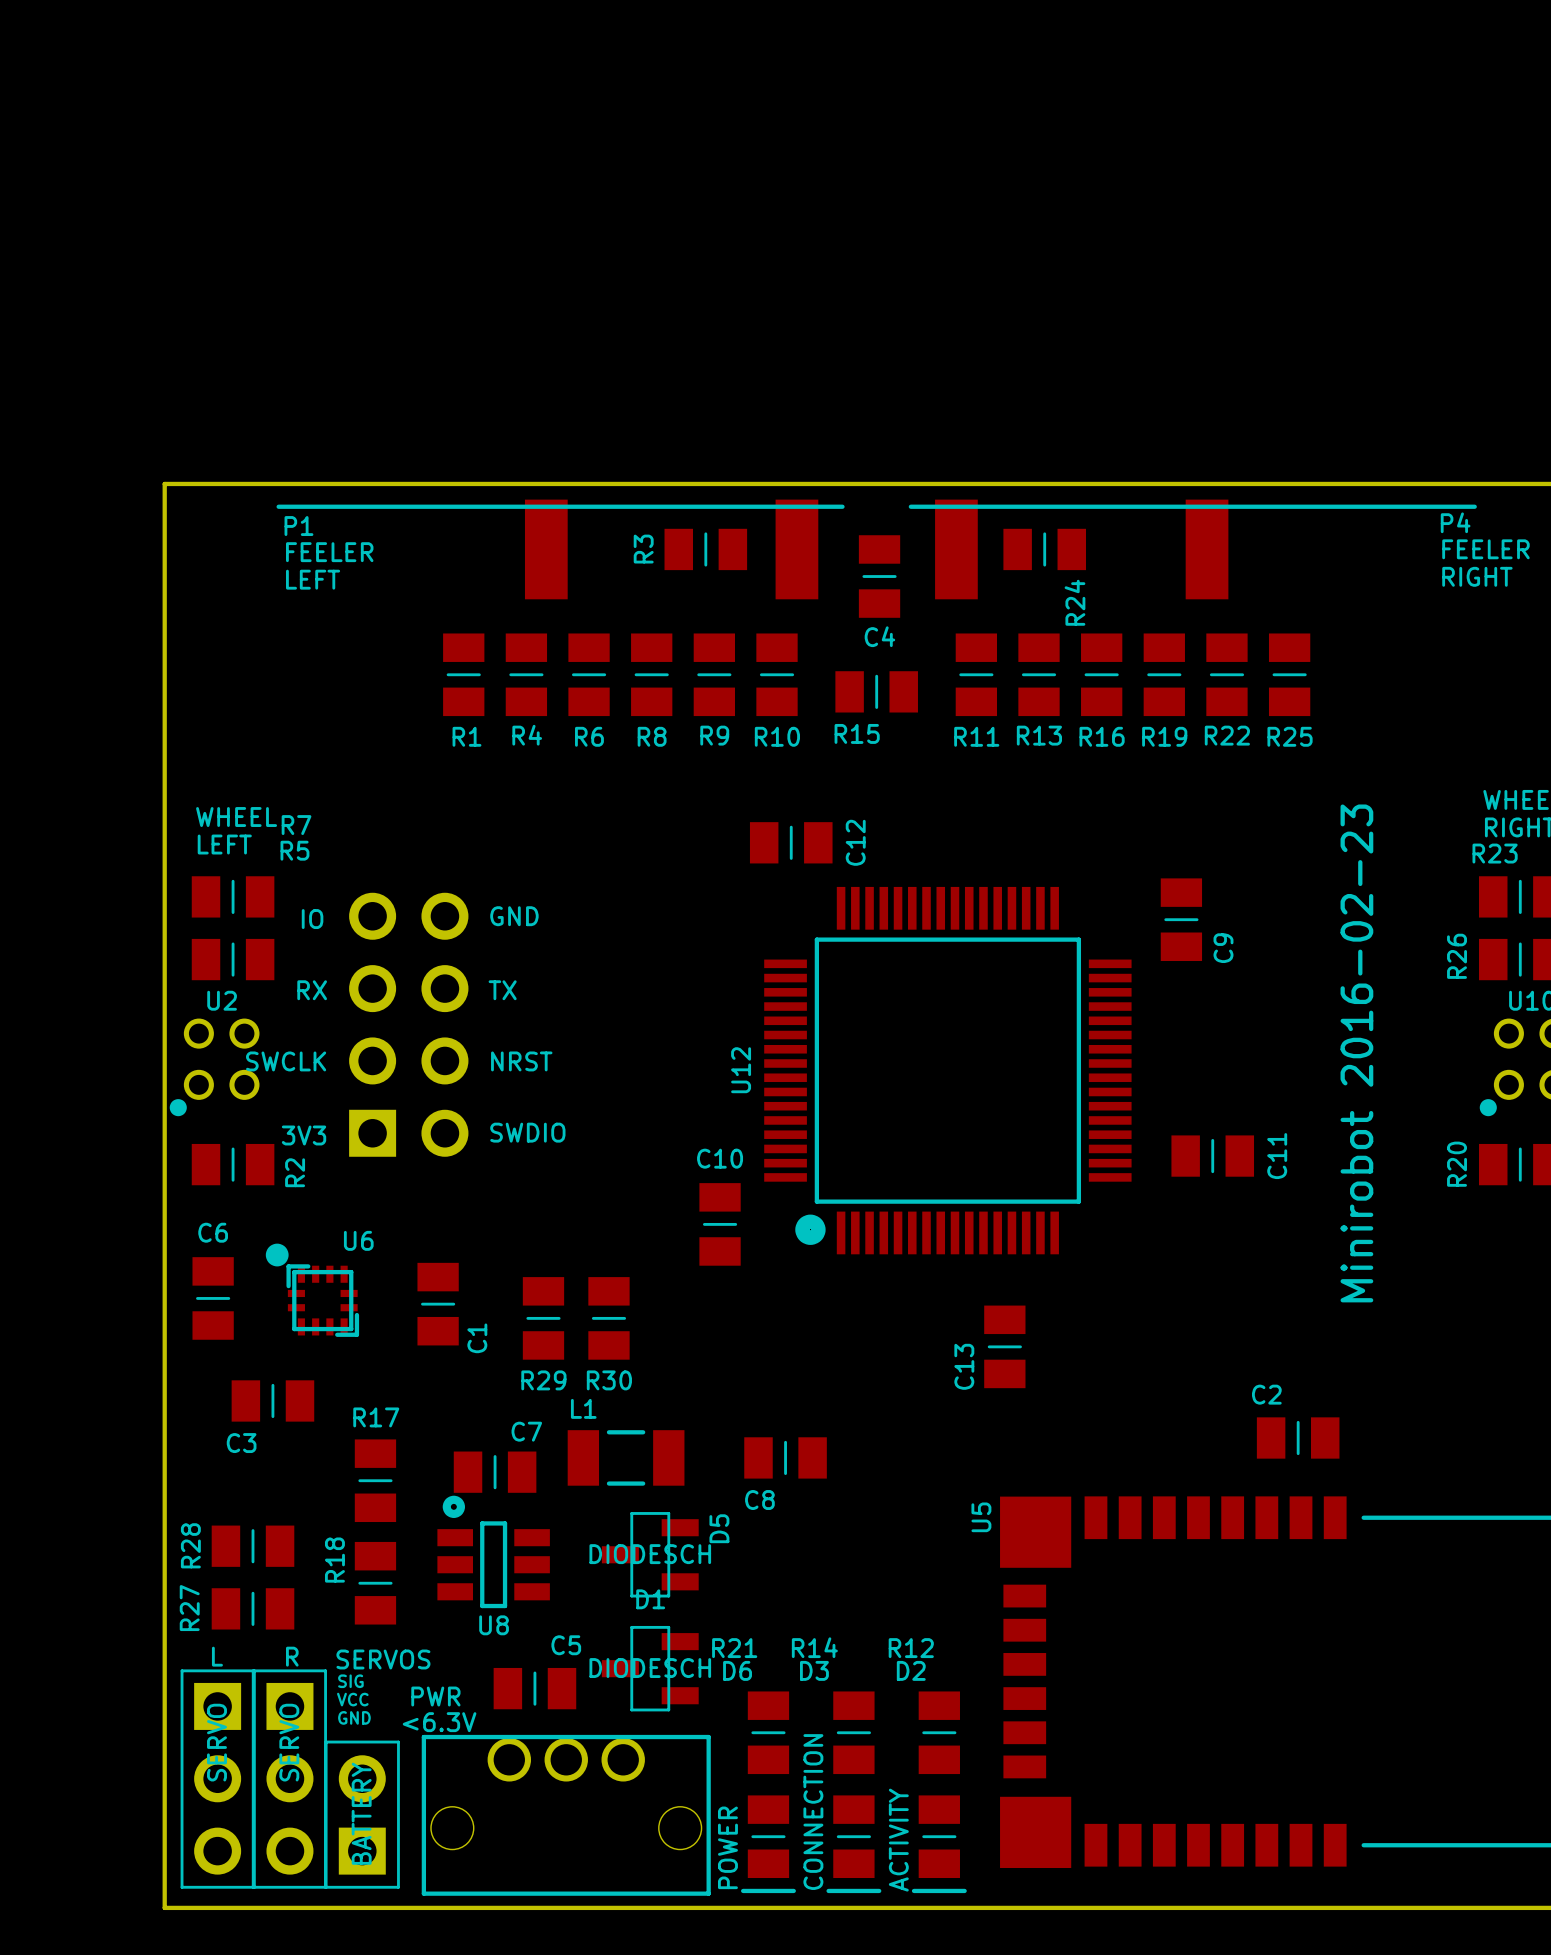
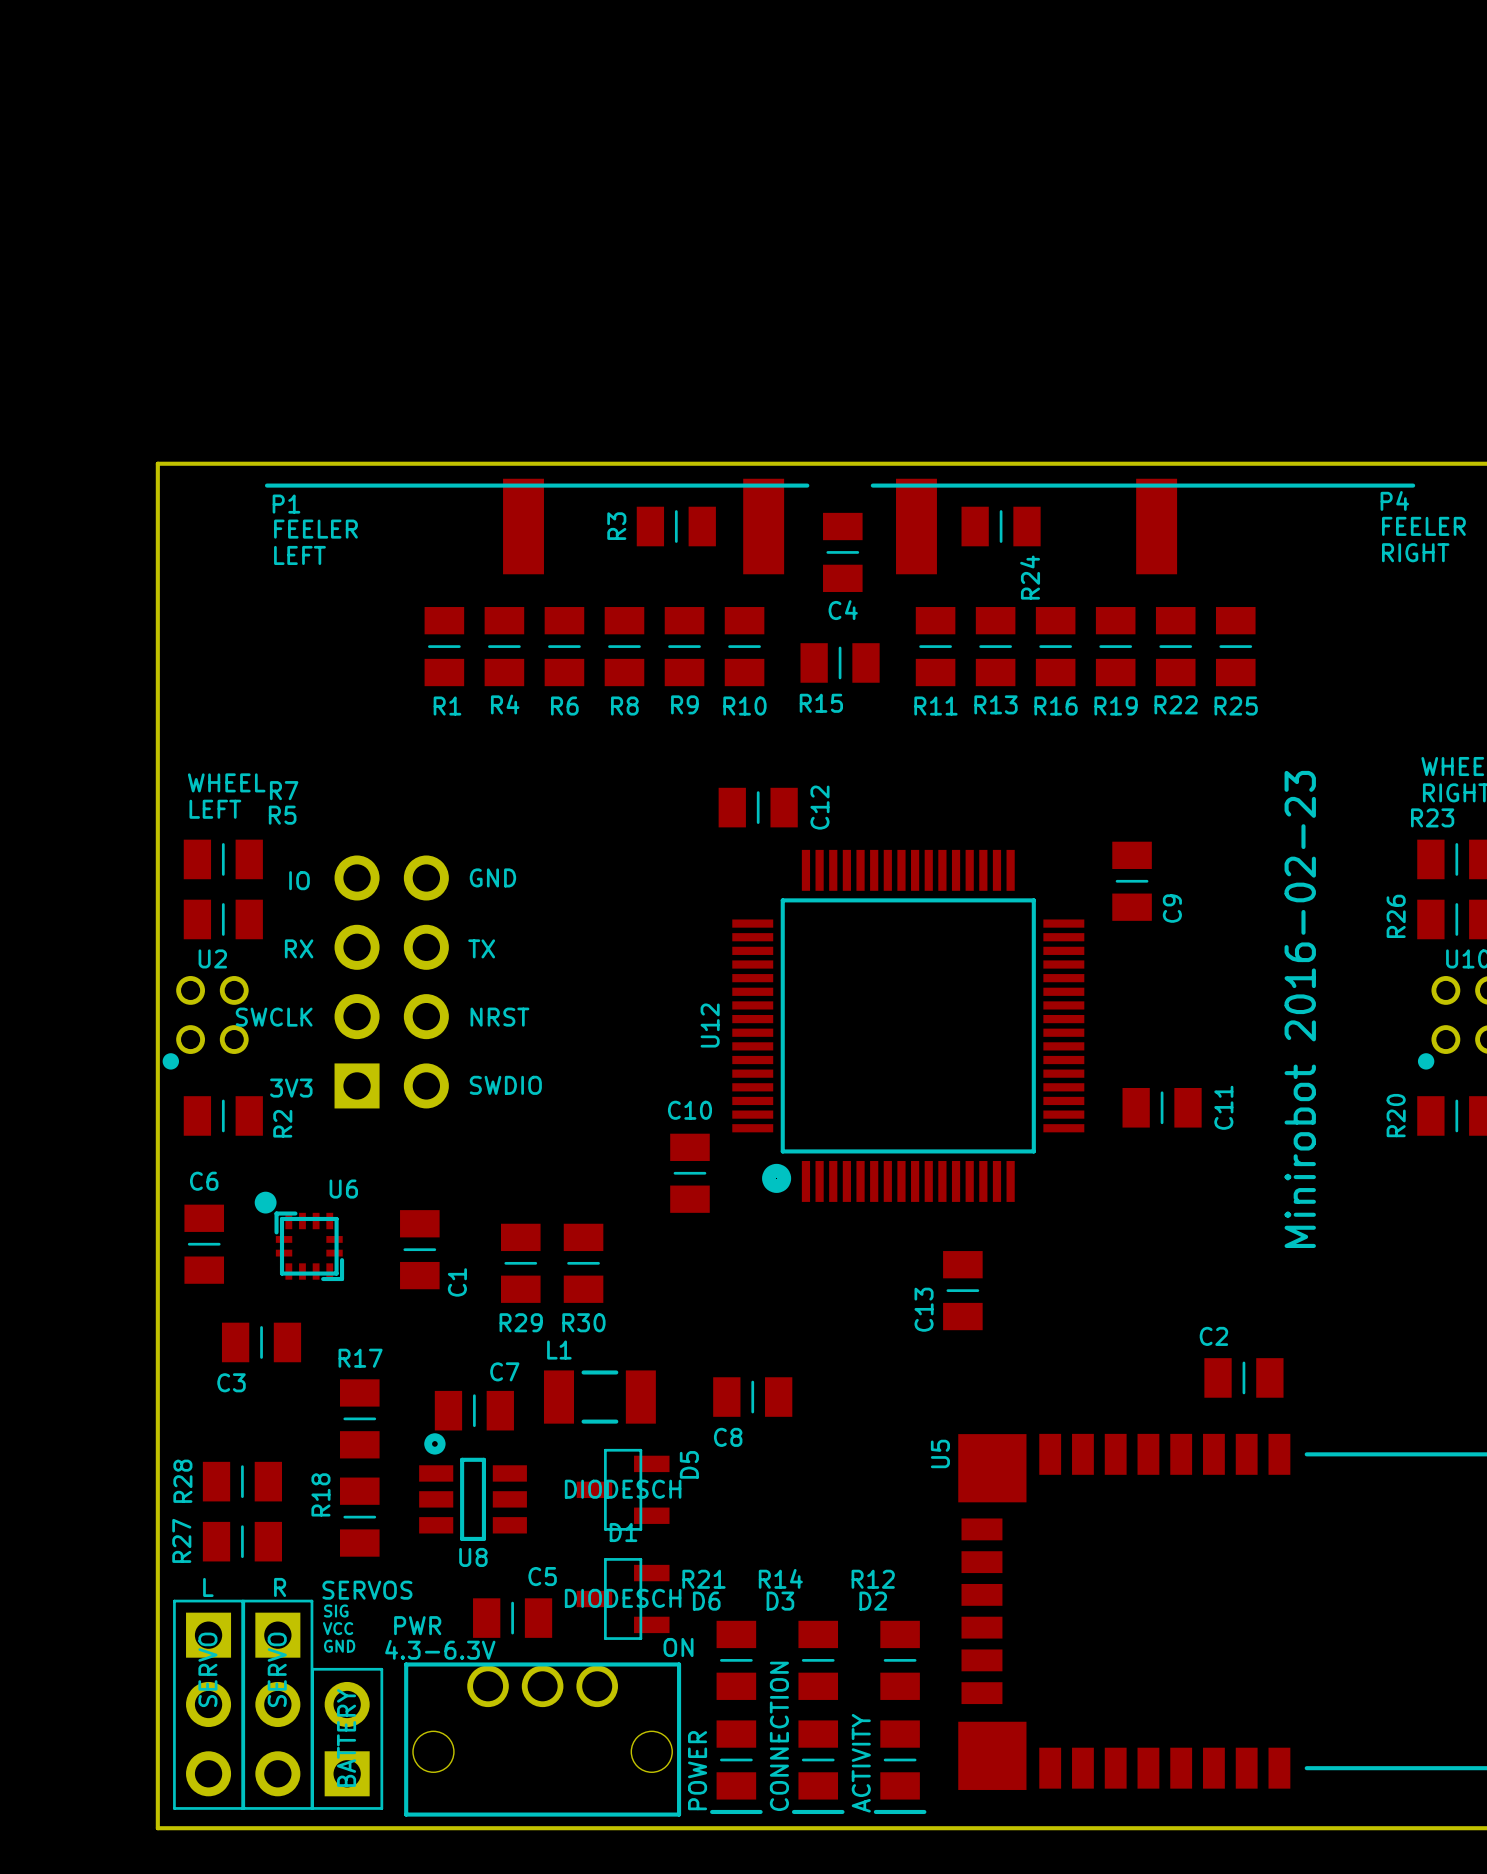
text: none -> ON (678, 1647)
text: <6.3V (439, 1722) -> 4.3-6.3V (440, 1649)

